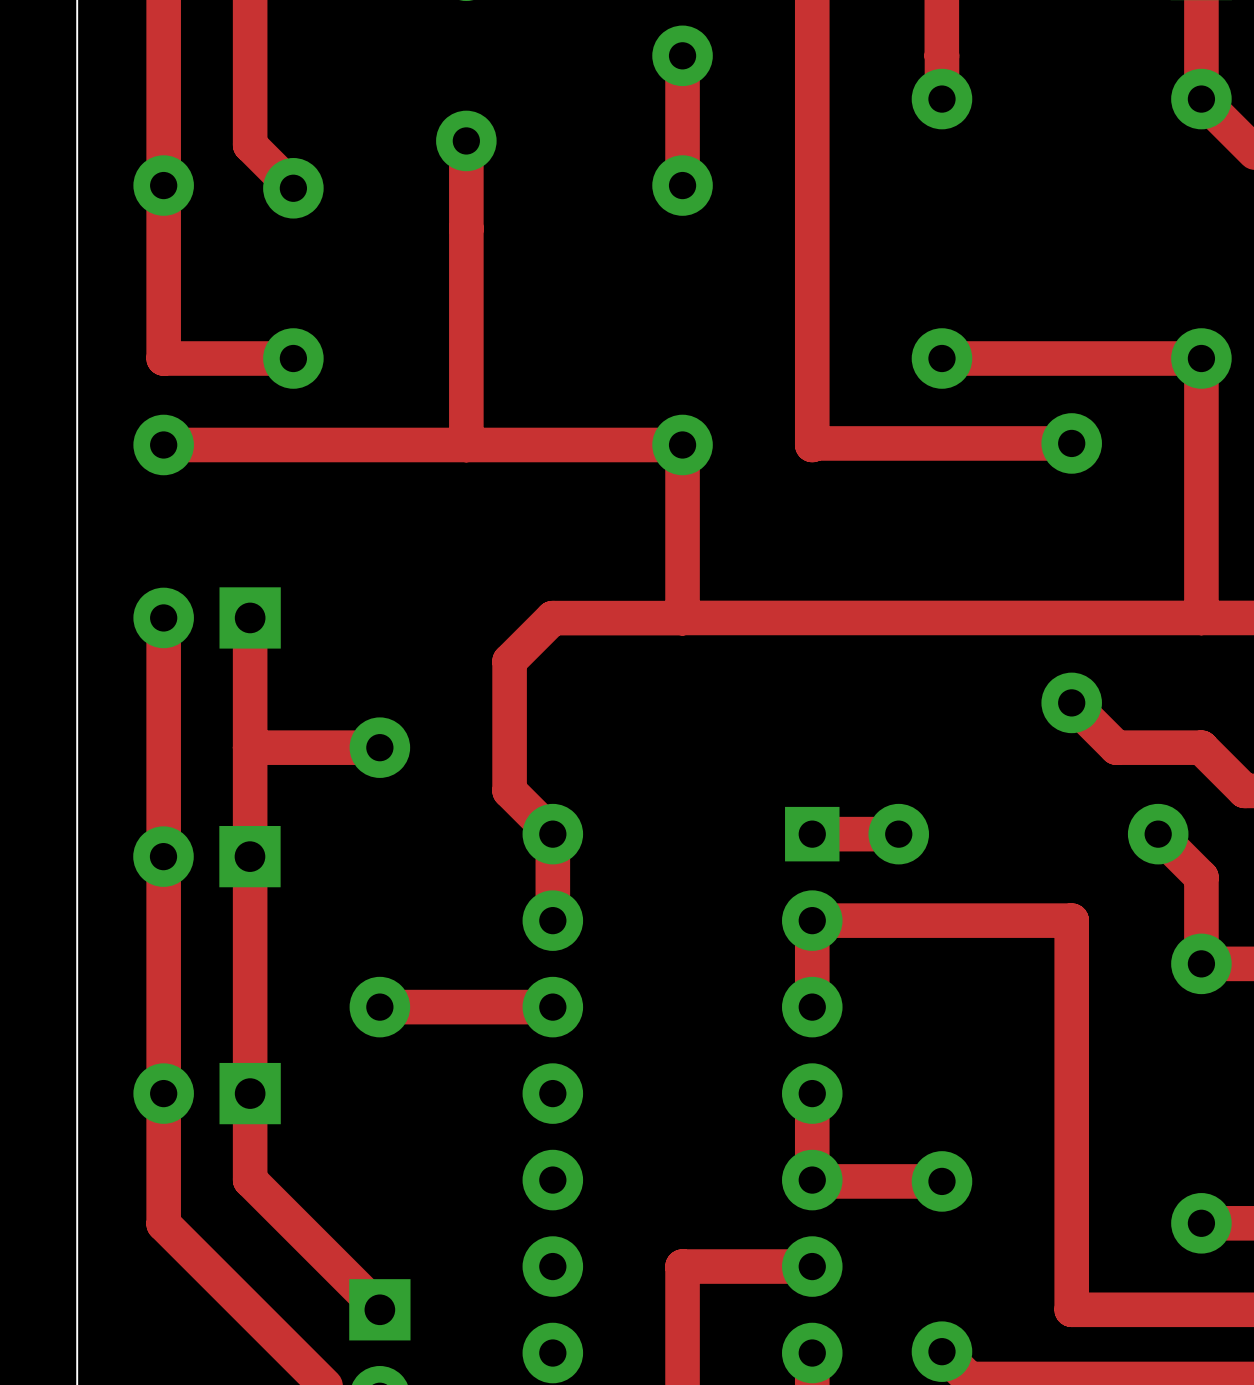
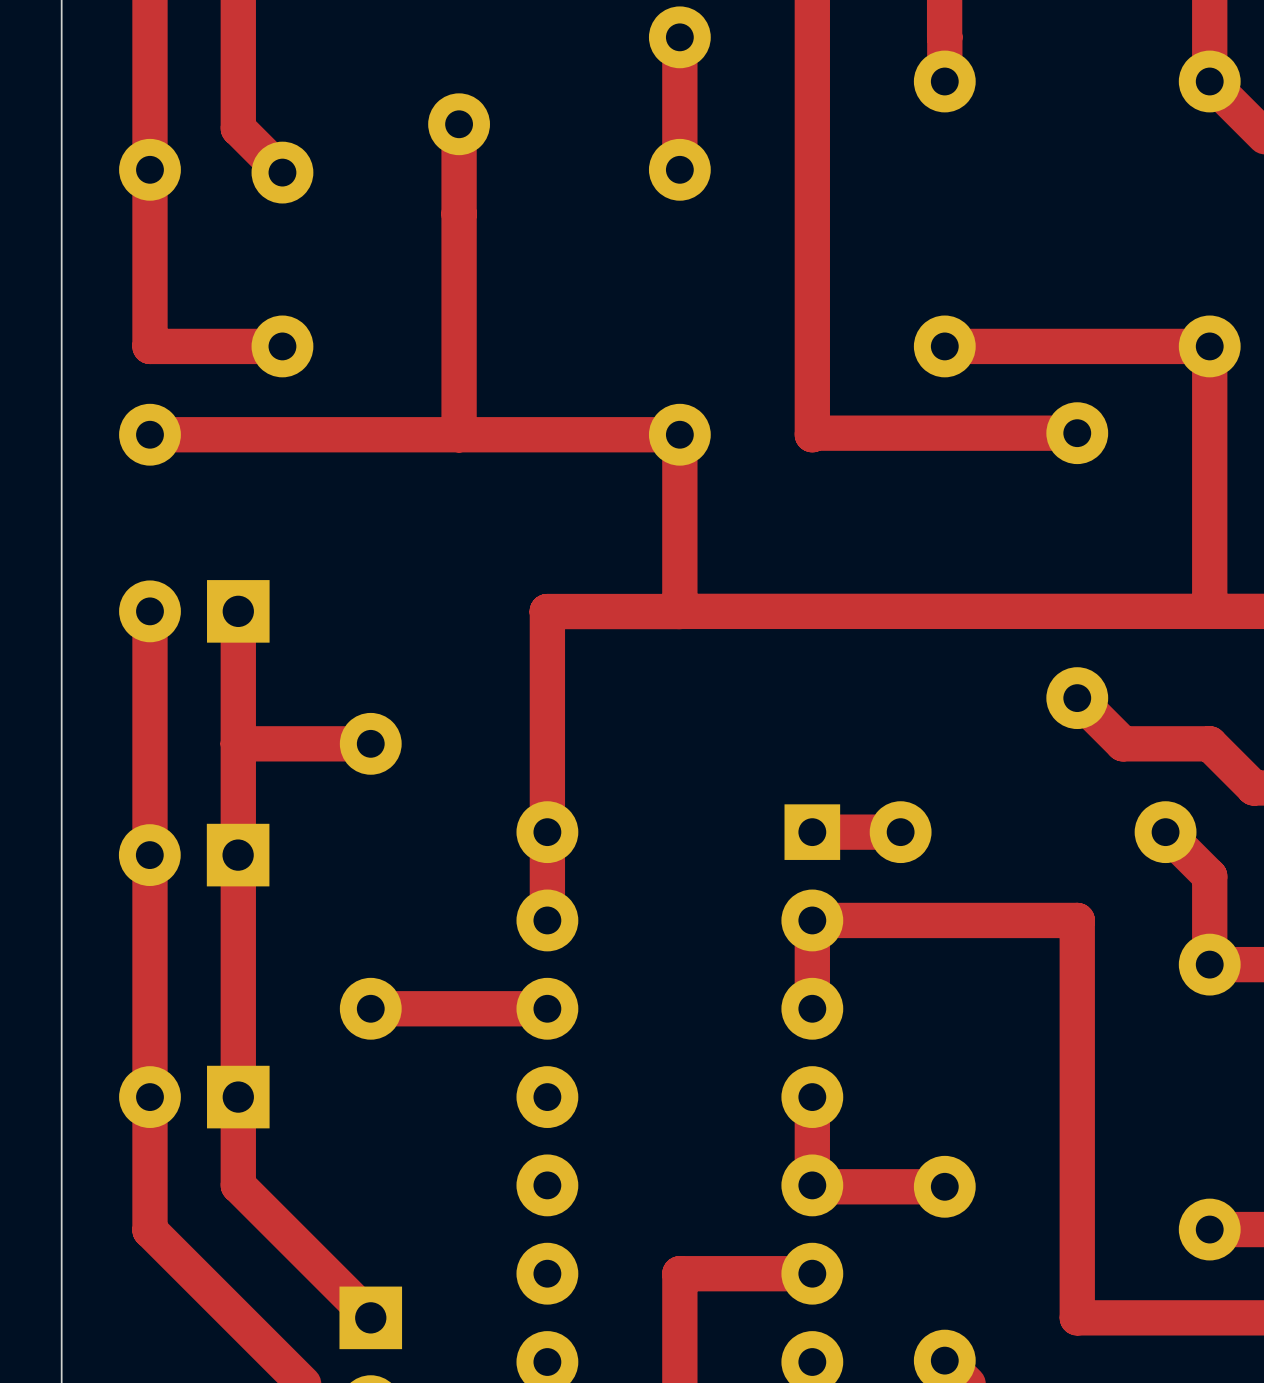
top track: (552, 618) (509, 661) (509, 790) (552, 834) -> (547, 611) (547, 832)

